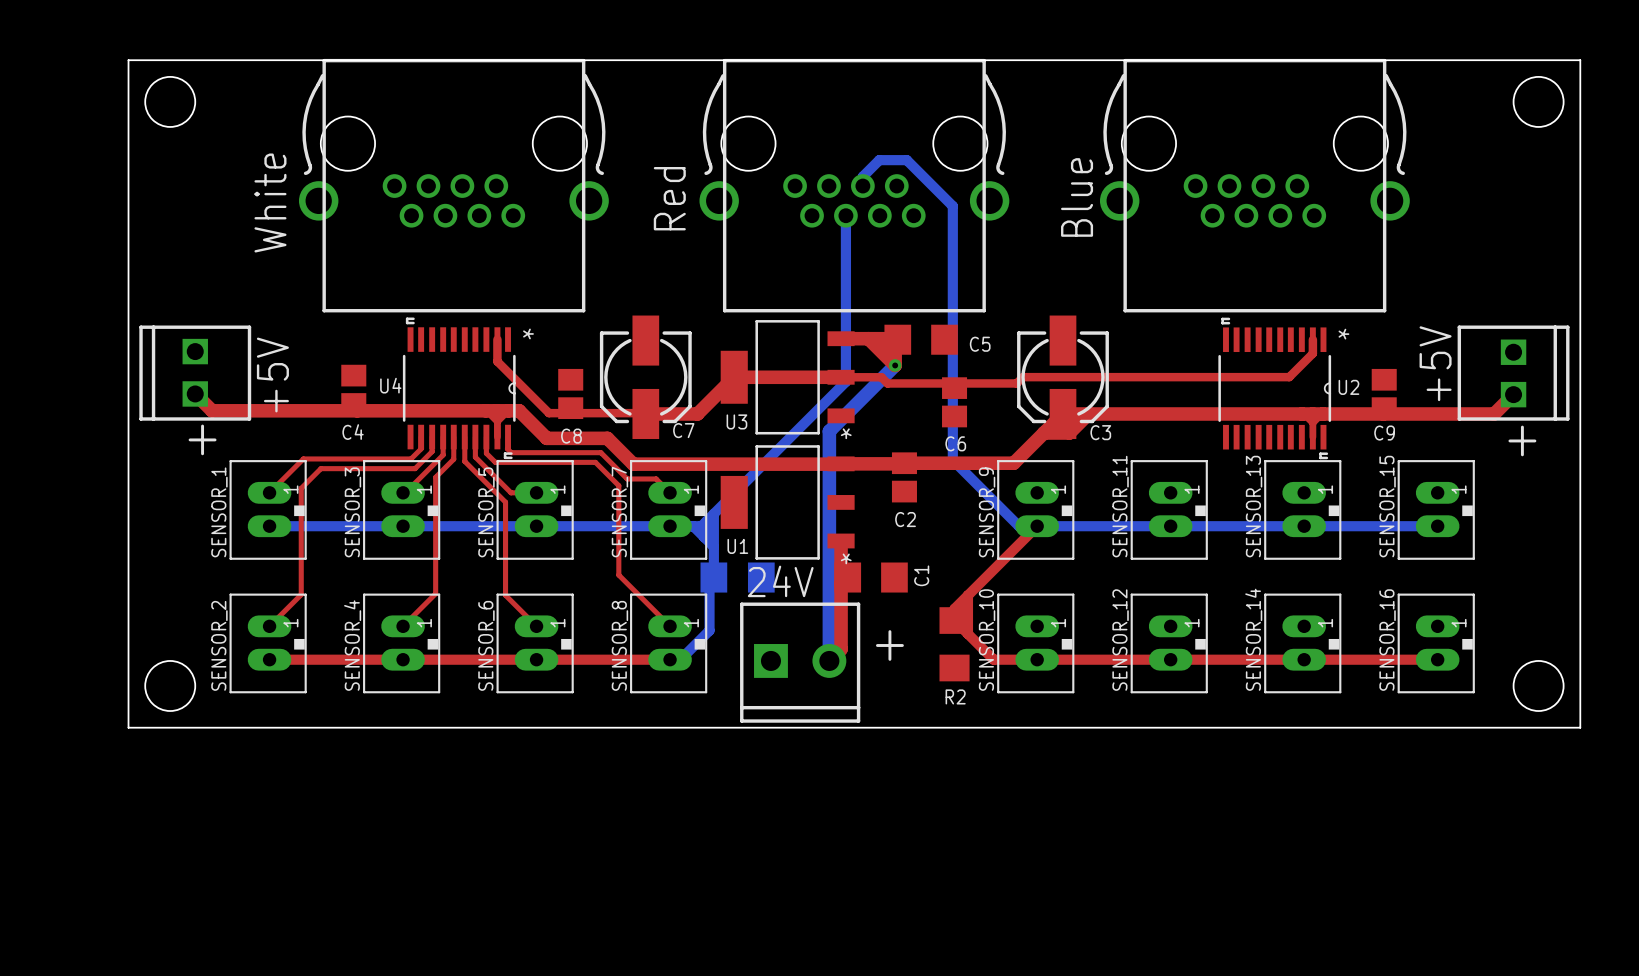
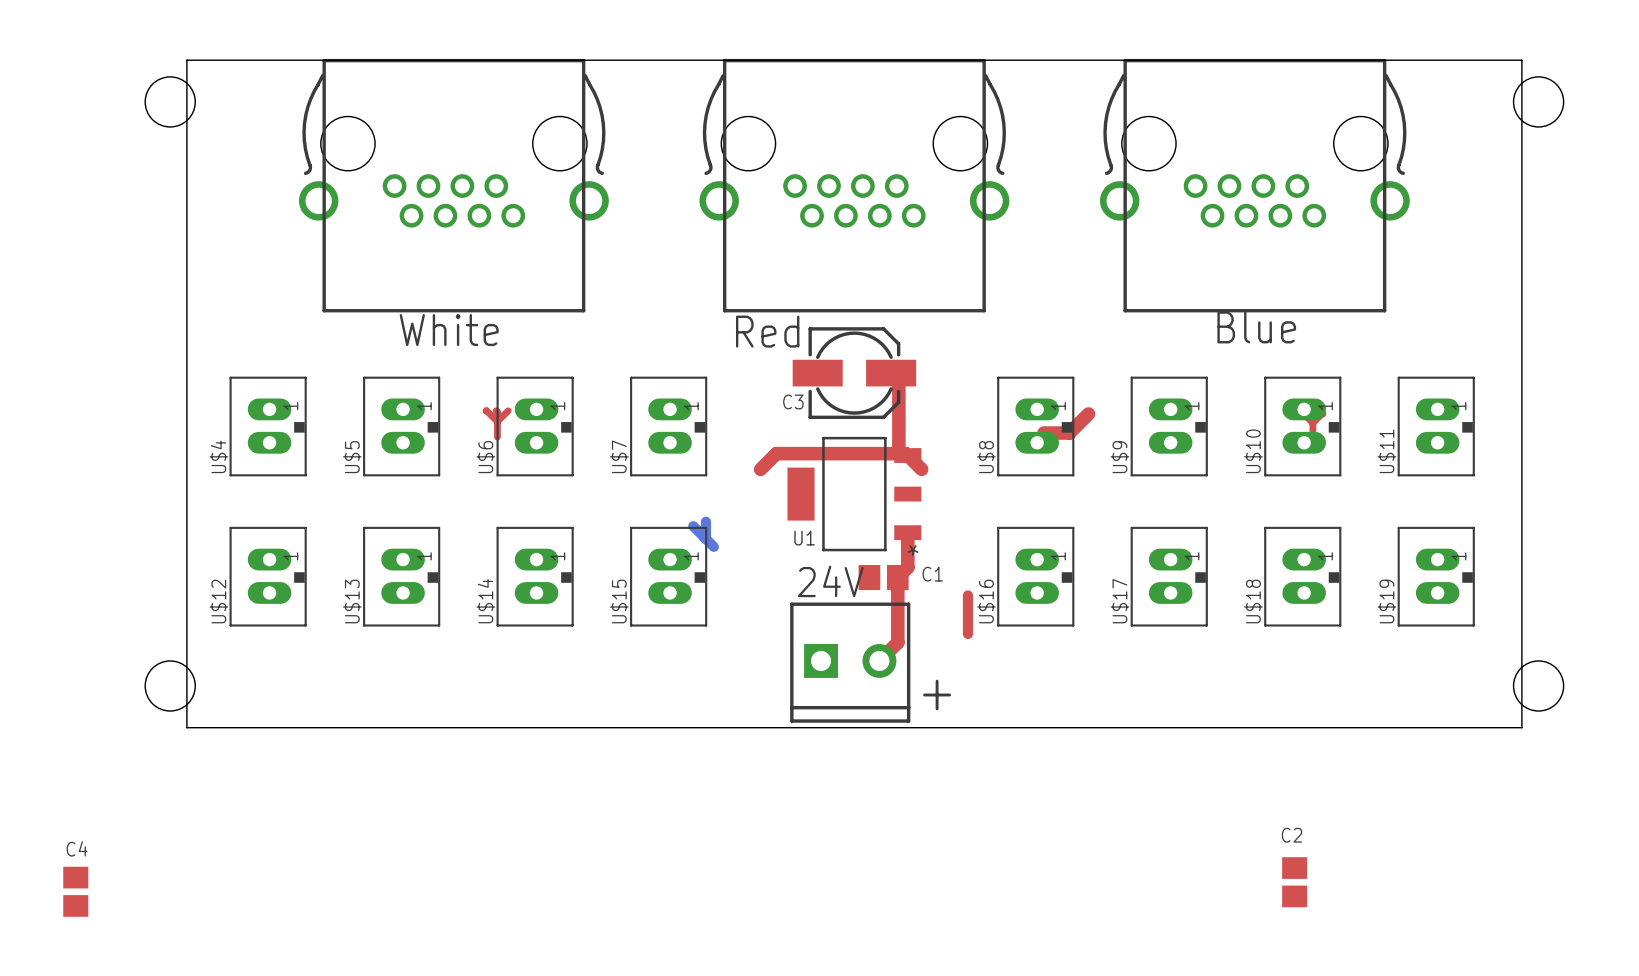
board edge: (186, 60) (128, 60) (128, 727) (186, 727) -> (186, 60) (186, 727)
board edge: (1521, 60) (1580, 60) (1580, 727) (1521, 727) -> (1521, 60) (1521, 727)
bottom track: (862, 186) (862, 176) (879, 160) (906, 160) (952, 206) (952, 460) (1018, 526) (1437, 526) -> none
text rotation: 0° (1077, 197) -> 90° clockwise (1256, 327)
text position: Blue (1077, 197) -> Blue (1256, 327)
text rotation: 0° (669, 198) -> 90° clockwise (767, 331)
text position: Red (669, 198) -> Red (767, 331)
text rotation: 0° (270, 202) -> 90° clockwise (449, 330)
text position: White (270, 202) -> White (449, 330)
bottom track: (845, 215) (845, 381) (701, 526) (269, 526) -> none
top track: (841, 338) (896, 338) (895, 365) (868, 338) -> none
top track: (497, 339) (497, 361) (549, 413) (645, 413) (697, 413) (734, 377) (881, 377) (887, 383) (1016, 383) (1023, 377) (1289, 377) (1312, 353) (1312, 339) -> none
C5: (921, 339) -> none
text: +5V (1435, 363) -> none
bottom track: (895, 365) (829, 431) (829, 660) -> none
via: (895, 365) -> none
part: (195, 373) -> none
top track: none -> (891, 373) (898, 380) (898, 453)
part: (1513, 373) -> none
text: +5V (272, 375) -> none
C7: (645, 377) -> none
U3: (787, 377) -> none
C3 rotation: 0° (1063, 377) -> 90° counterclockwise (854, 373)
C3 position: (1063, 377) -> (854, 373)
U4: (459, 388) -> none
U2: (1274, 388) -> none
C4 position: (353, 389) -> (75, 891)
top track: (195, 393) (212, 410) (519, 410) (546, 438) (607, 438) (633, 464) (1013, 463) (1063, 413) (1494, 413) (1513, 394) -> none
C8: (570, 393) -> none
C9: (1384, 393) -> none
C6: (954, 402) -> none
U$4: none -> (268, 426)
U$5: none -> (401, 426)
U$6: none -> (535, 426)
U$7: none -> (668, 426)
U$8: none -> (1035, 426)
U$9: none -> (1169, 426)
U$10: none -> (1302, 426)
U$11: none -> (1436, 426)
C4 name position: C4 (353, 432) -> C4 (77, 848)
C3 name position: C3 (1100, 432) -> C3 (793, 401)
top track: (421, 437) (421, 448) (411, 458) (303, 458) (269, 492) -> none
top track: (432, 437) (432, 451) (415, 468) (320, 468) (301, 488) (301, 594) (269, 626) -> none
top track: (443, 437) (443, 454) (405, 492) (403, 492) -> none
top track: (453, 437) (453, 459) (435, 477) (435, 593) (403, 626) -> none
top track: (464, 437) (464, 461) (505, 502) (505, 595) (536, 626) -> none
top track: (475, 437) (475, 457) (511, 492) (536, 492) -> none
top track: (486, 437) (486, 453) (495, 462) (595, 462) (618, 485) (618, 575) (670, 626) -> none
top track: (508, 437) (507, 448) (511, 452) (600, 452) (627, 478) (656, 478) (670, 492) -> none
text: + (202, 439) -> none
text: + (1522, 440) -> none
top track: none -> (760, 469) (776, 453) (905, 453) (921, 469)
C2 position: (904, 477) -> (1294, 882)
U1 position: (787, 502) -> (854, 494)
SENSOR_1: (268, 509) -> none
SENSOR_3: (401, 509) -> none
SENSOR_5: (535, 509) -> none
SENSOR_7: (668, 509) -> none
SENSOR_9: (1035, 509) -> none
SENSOR_11: (1169, 509) -> none
SENSOR_13: (1302, 509) -> none
SENSOR_15: (1436, 509) -> none
bottom track: (713, 513) (713, 577) (709, 581) (709, 630) (680, 659) (670, 659) -> none
C2 name position: C2 (905, 519) -> C2 (1291, 835)
top track: (1037, 526) (954, 608) (954, 620) (993, 659) (1437, 659) -> none
top track: none -> (907, 532) (907, 567) (897, 577) (897, 642) (879, 660)
top track: (841, 541) (841, 649) (829, 660) -> none
C1 footprint: [834, 562, 908, 593] -> [858, 565, 909, 591]
U$12: none -> (268, 576)
U$13: none -> (401, 576)
U$14: none -> (535, 576)
U$15: none -> (668, 576)
U$16: none -> (1035, 576)
U$17: none -> (1169, 576)
U$18: none -> (1302, 576)
U$19: none -> (1436, 576)
part: (737, 577) -> none
SENSOR_2: (268, 643) -> none
SENSOR_4: (401, 643) -> none
SENSOR_6: (535, 643) -> none
SENSOR_8: (668, 643) -> none
SENSOR_10: (1035, 643) -> none
SENSOR_12: (1169, 643) -> none
SENSOR_14: (1302, 643) -> none
SENSOR_16: (1436, 643) -> none
R2: (954, 644) -> none
text position: + (889, 645) -> + (937, 695)
top track: (269, 659) (670, 659) -> none
24V position: (800, 662) -> (850, 662)

